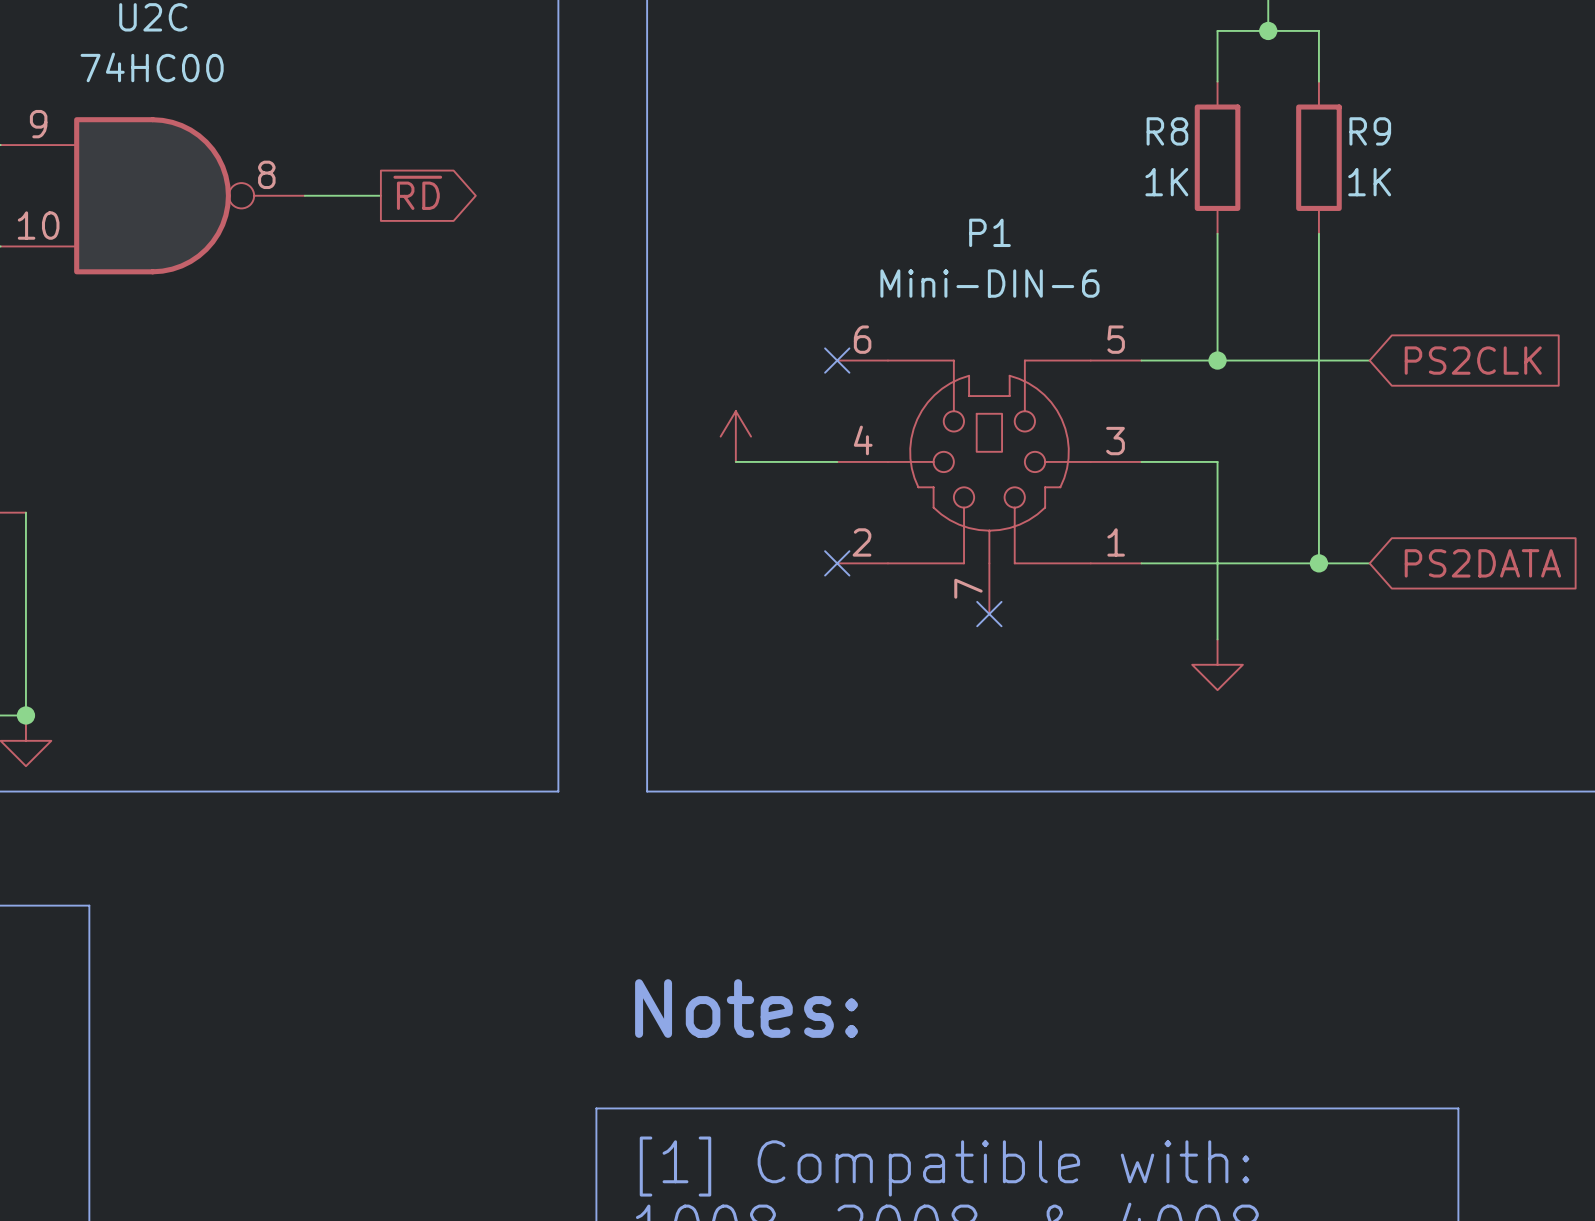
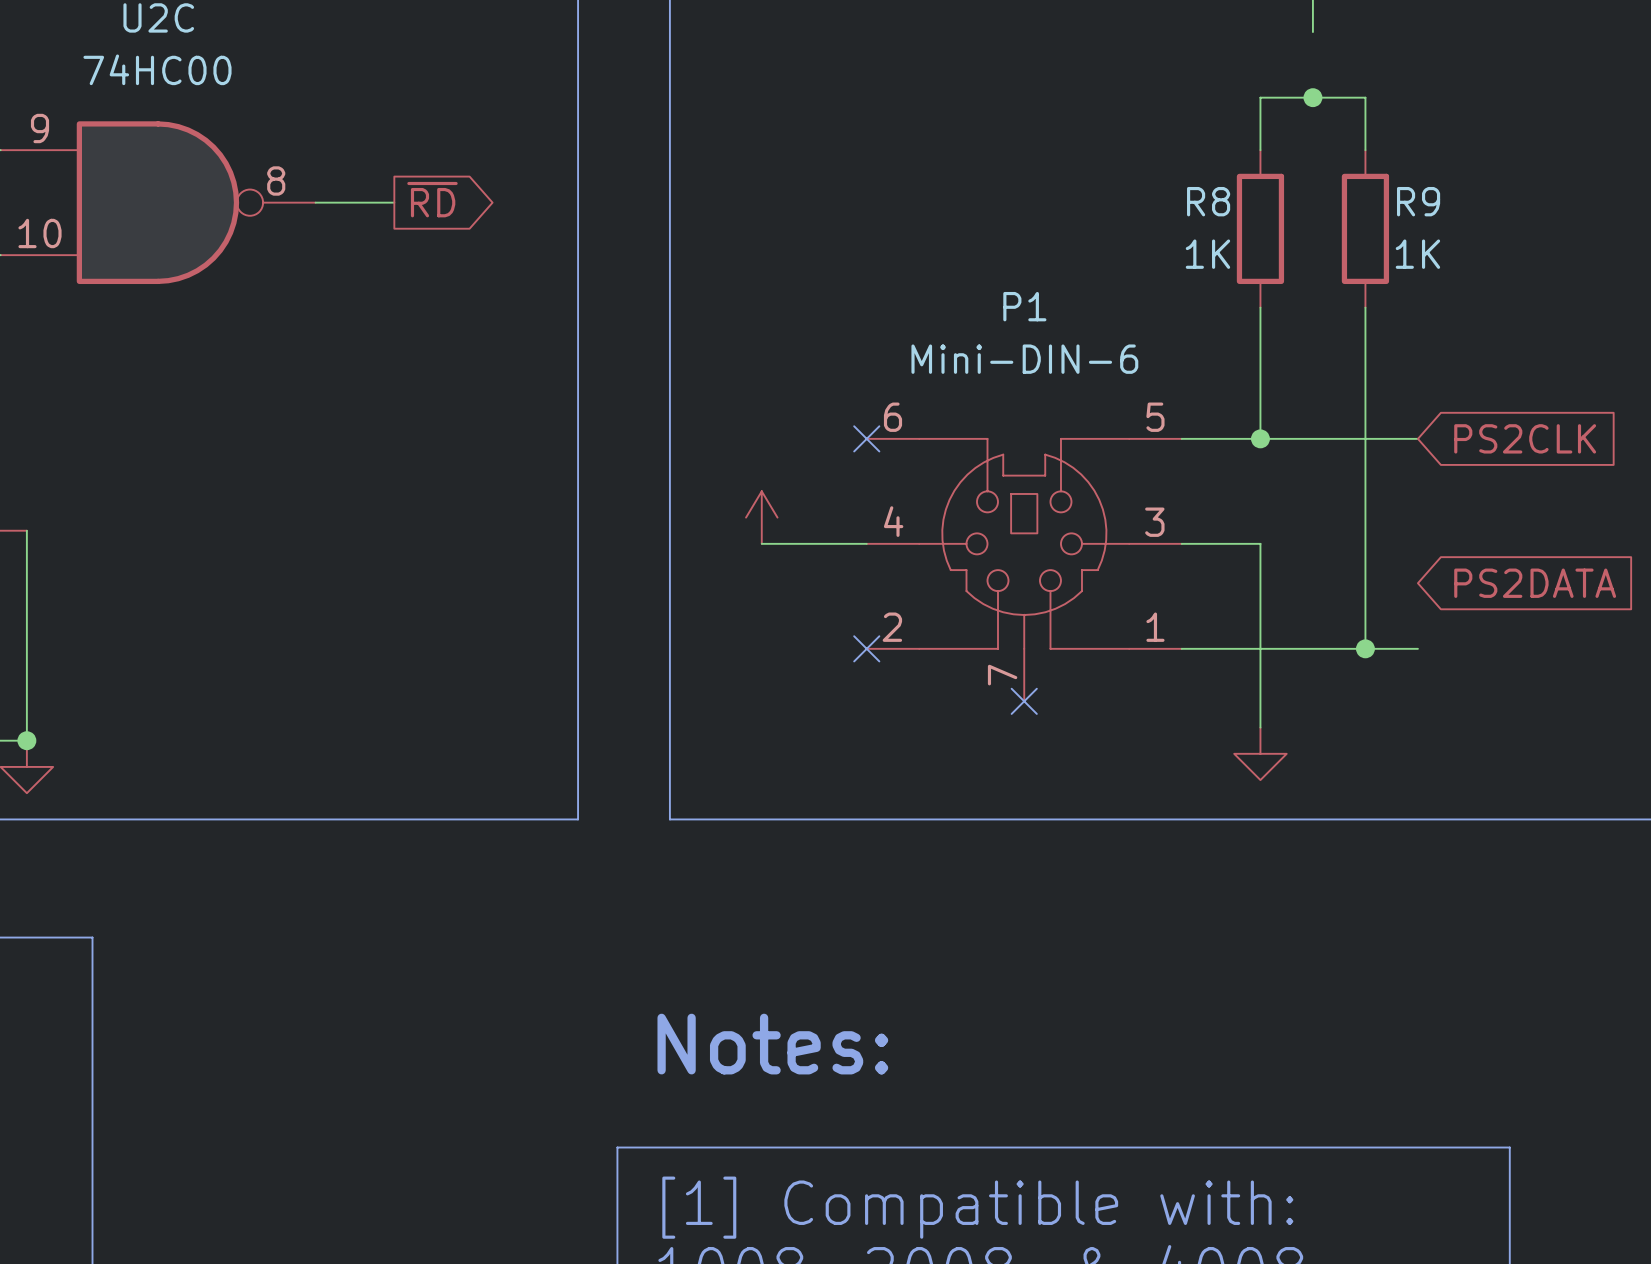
junction position: (1268, 30) -> (1312, 97)
wire: (1217, 81) (1217, 30) (1318, 30) (1318, 81) -> (1260, 150) (1260, 97) (1365, 97) (1365, 150)
R8 position: (1217, 157) -> (1260, 228)
R9 position: (1318, 157) -> (1365, 228)
wire: (1217, 233) (1217, 297) -> (1260, 373) (1260, 438)
wire: (1318, 233) (1318, 297) -> (1365, 583) (1365, 648)
no-connect mark position: (837, 360) -> (866, 438)
wire: (1141, 360) (1369, 360) -> (1181, 438) (1417, 438)
junction position: (1217, 360) -> (1260, 438)
global label position: PS2CLK (1473, 360) -> PS2CLK (1525, 438)
power symbol position: (735, 436) -> (761, 517)
wire: (735, 461) (837, 461) -> (761, 543) (866, 543)
wire: (1141, 461) (1217, 461) (1217, 525) -> (1181, 543) (1260, 543)
P1 position: (989, 487) -> (1024, 570)
no-connect mark position: (837, 563) -> (866, 648)
wire: (1141, 563) (1369, 563) -> (1181, 648) (1417, 648)
junction position: (1318, 563) -> (1365, 648)
no-connect mark position: (989, 614) -> (1024, 701)
wire: none -> (1260, 661) (1260, 727)
power symbol position: (1217, 664) -> (1260, 753)

